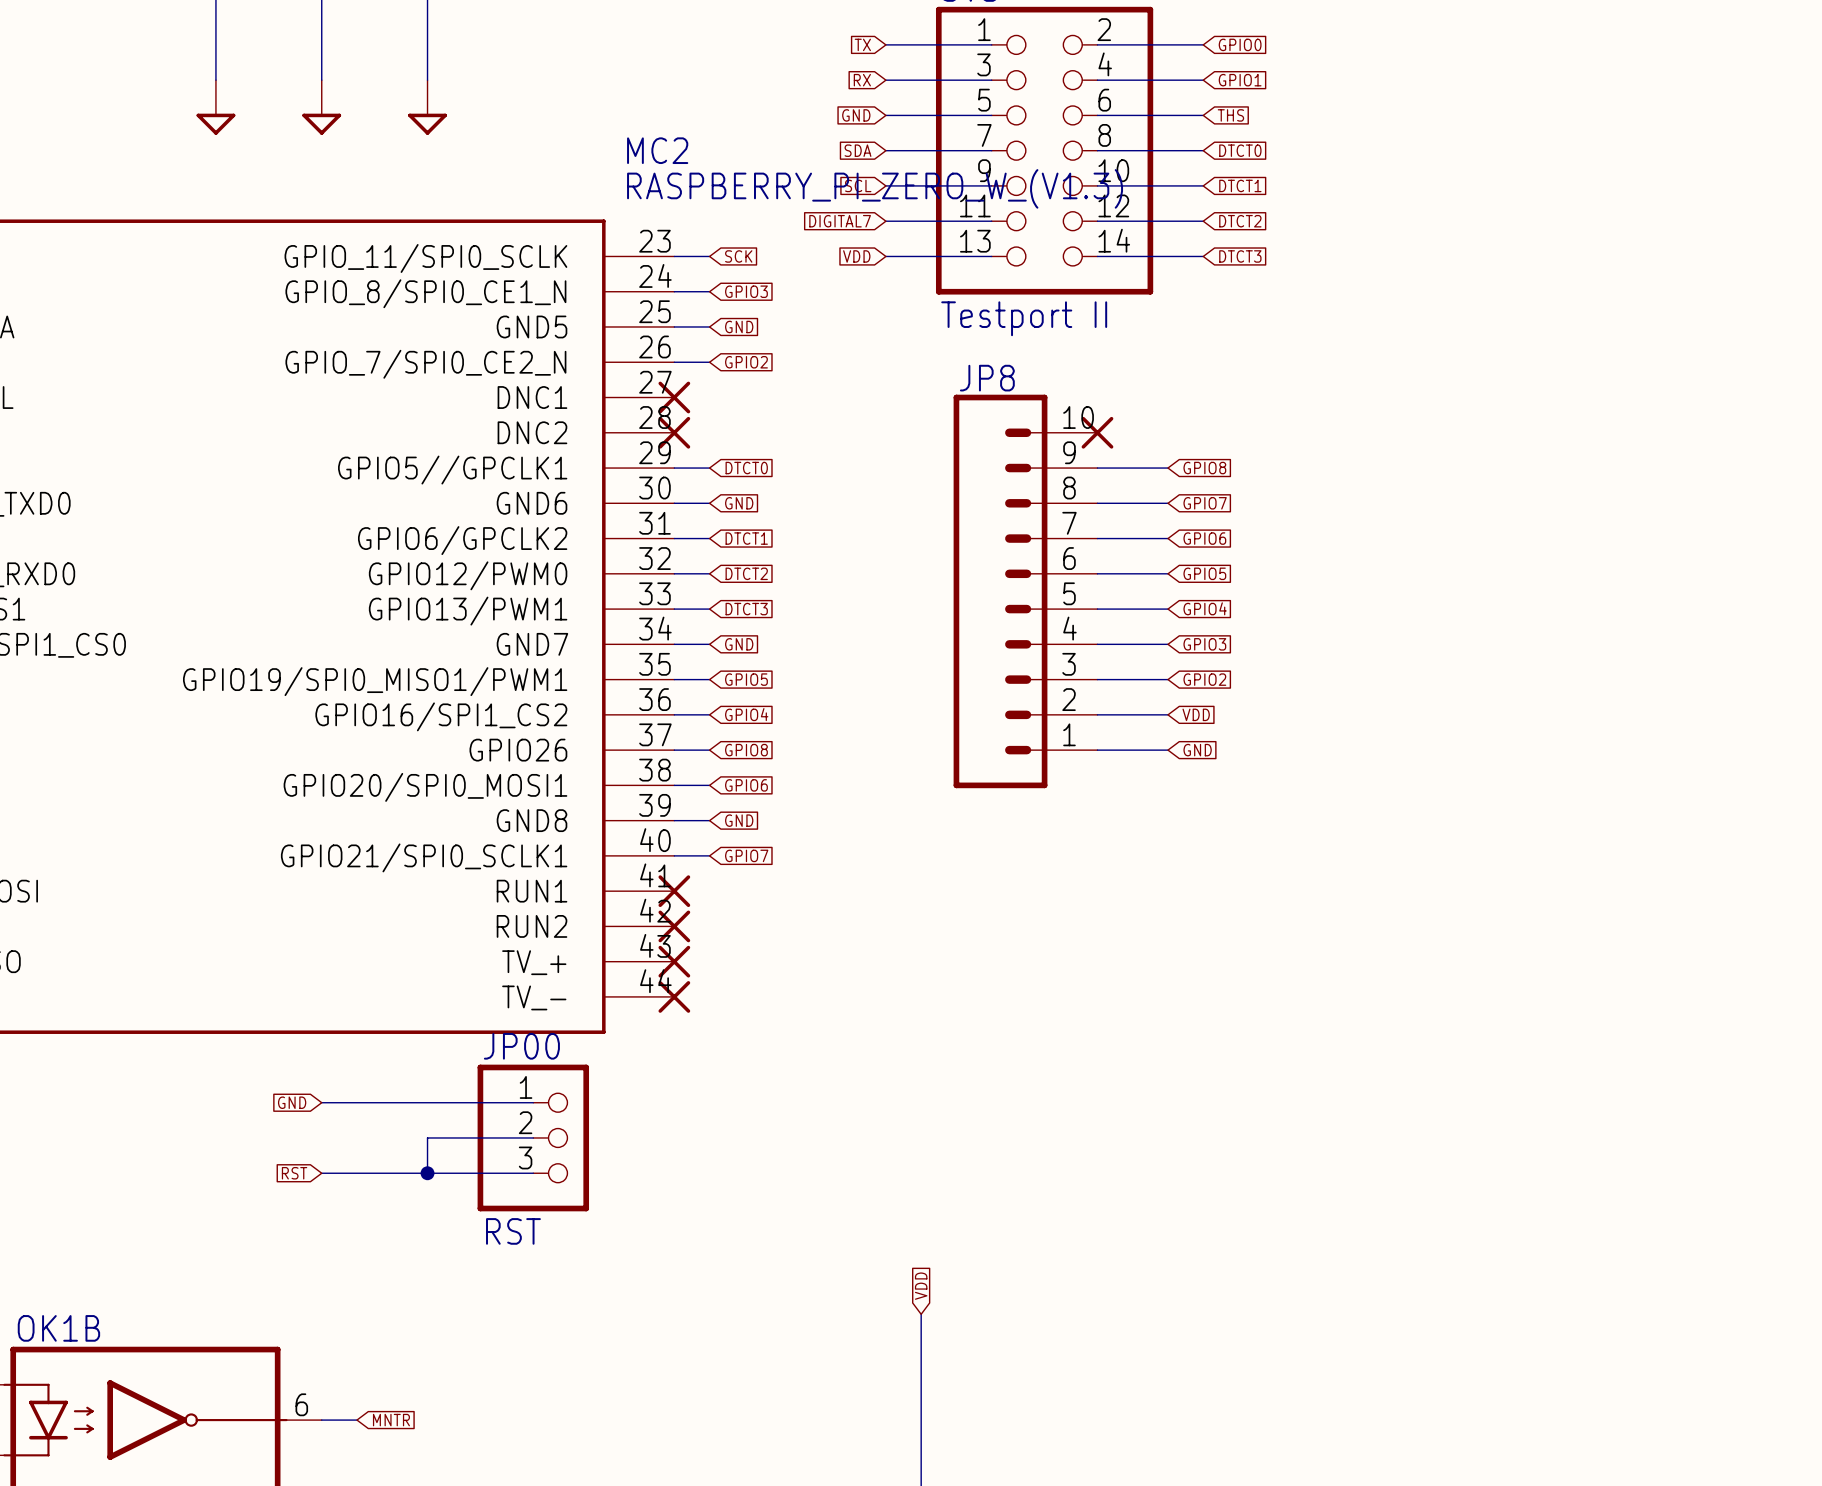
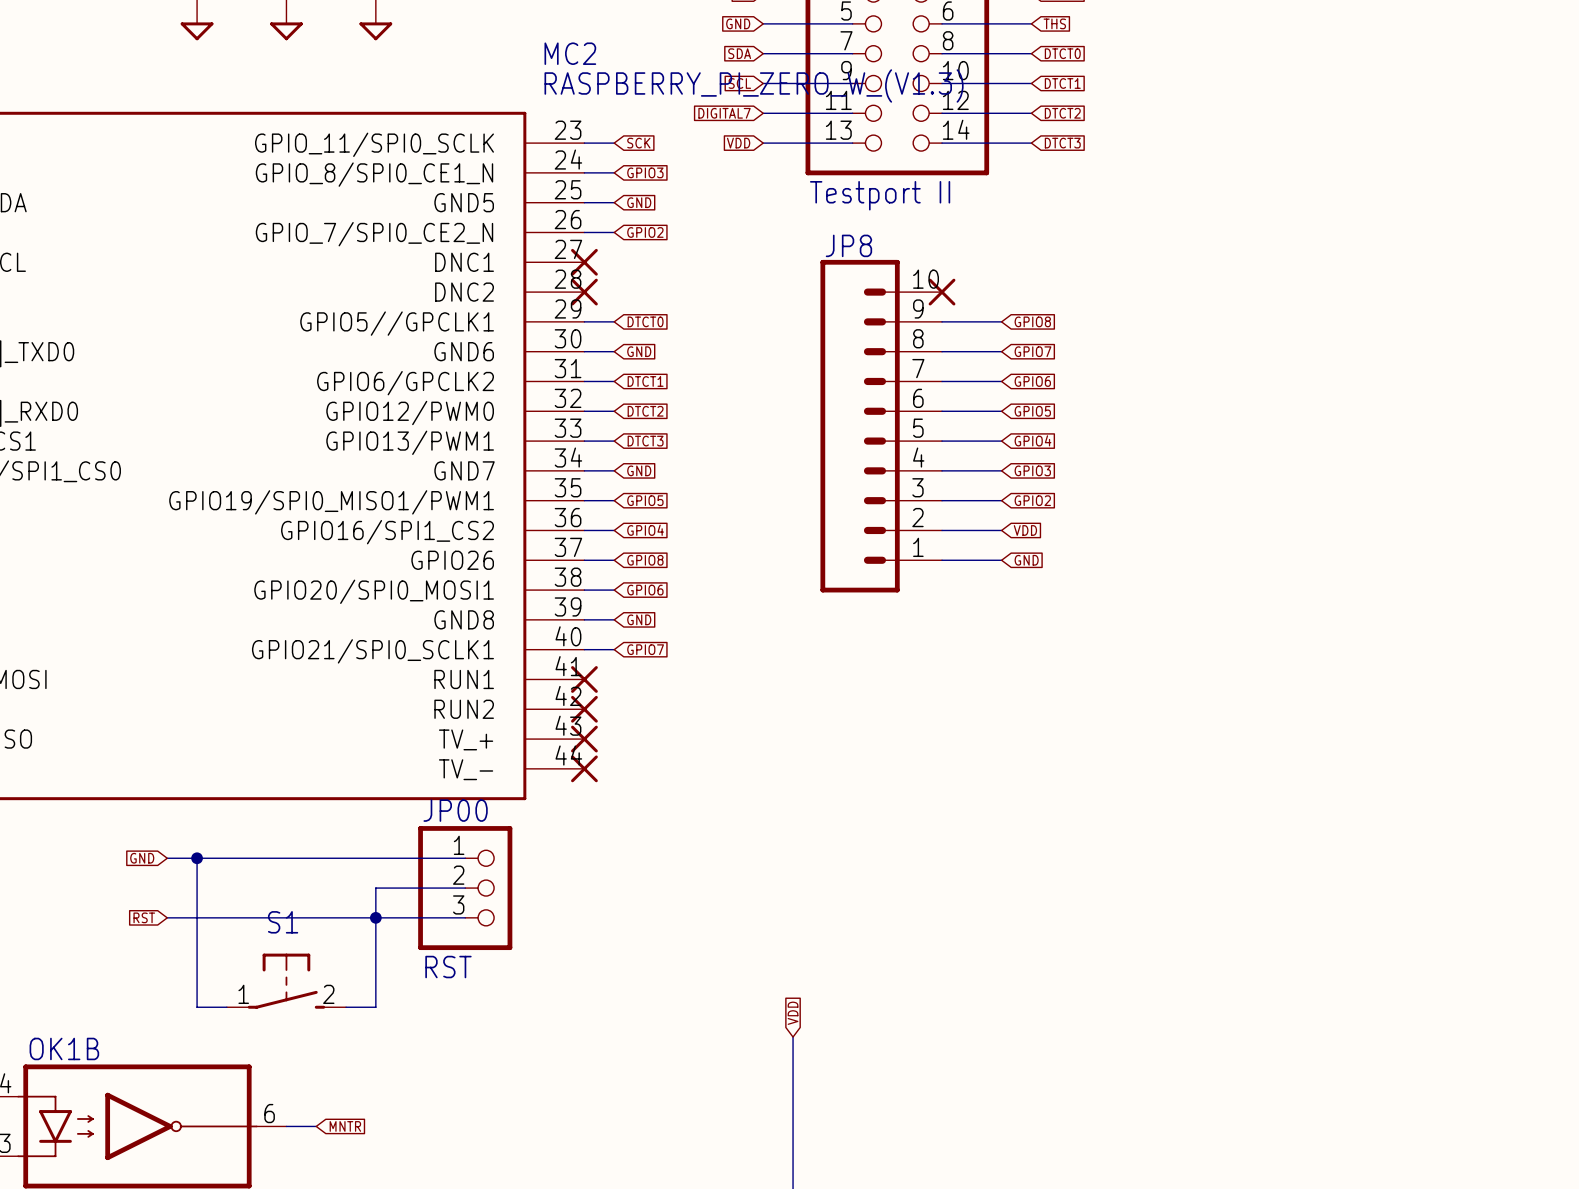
wire: none -> (167, 858) (286, 858)
wire: none -> (197, 858) (197, 1007) (226, 1007)
junction: none -> (197, 858)
global label position: GND (292, 1102) -> GND (142, 858)
wire: none -> (167, 917) (286, 917)
global label position: RST (294, 1173) -> RST (144, 917)
wire: none -> (375, 917) (375, 1007) (346, 1007)
S1: none -> (286, 981)

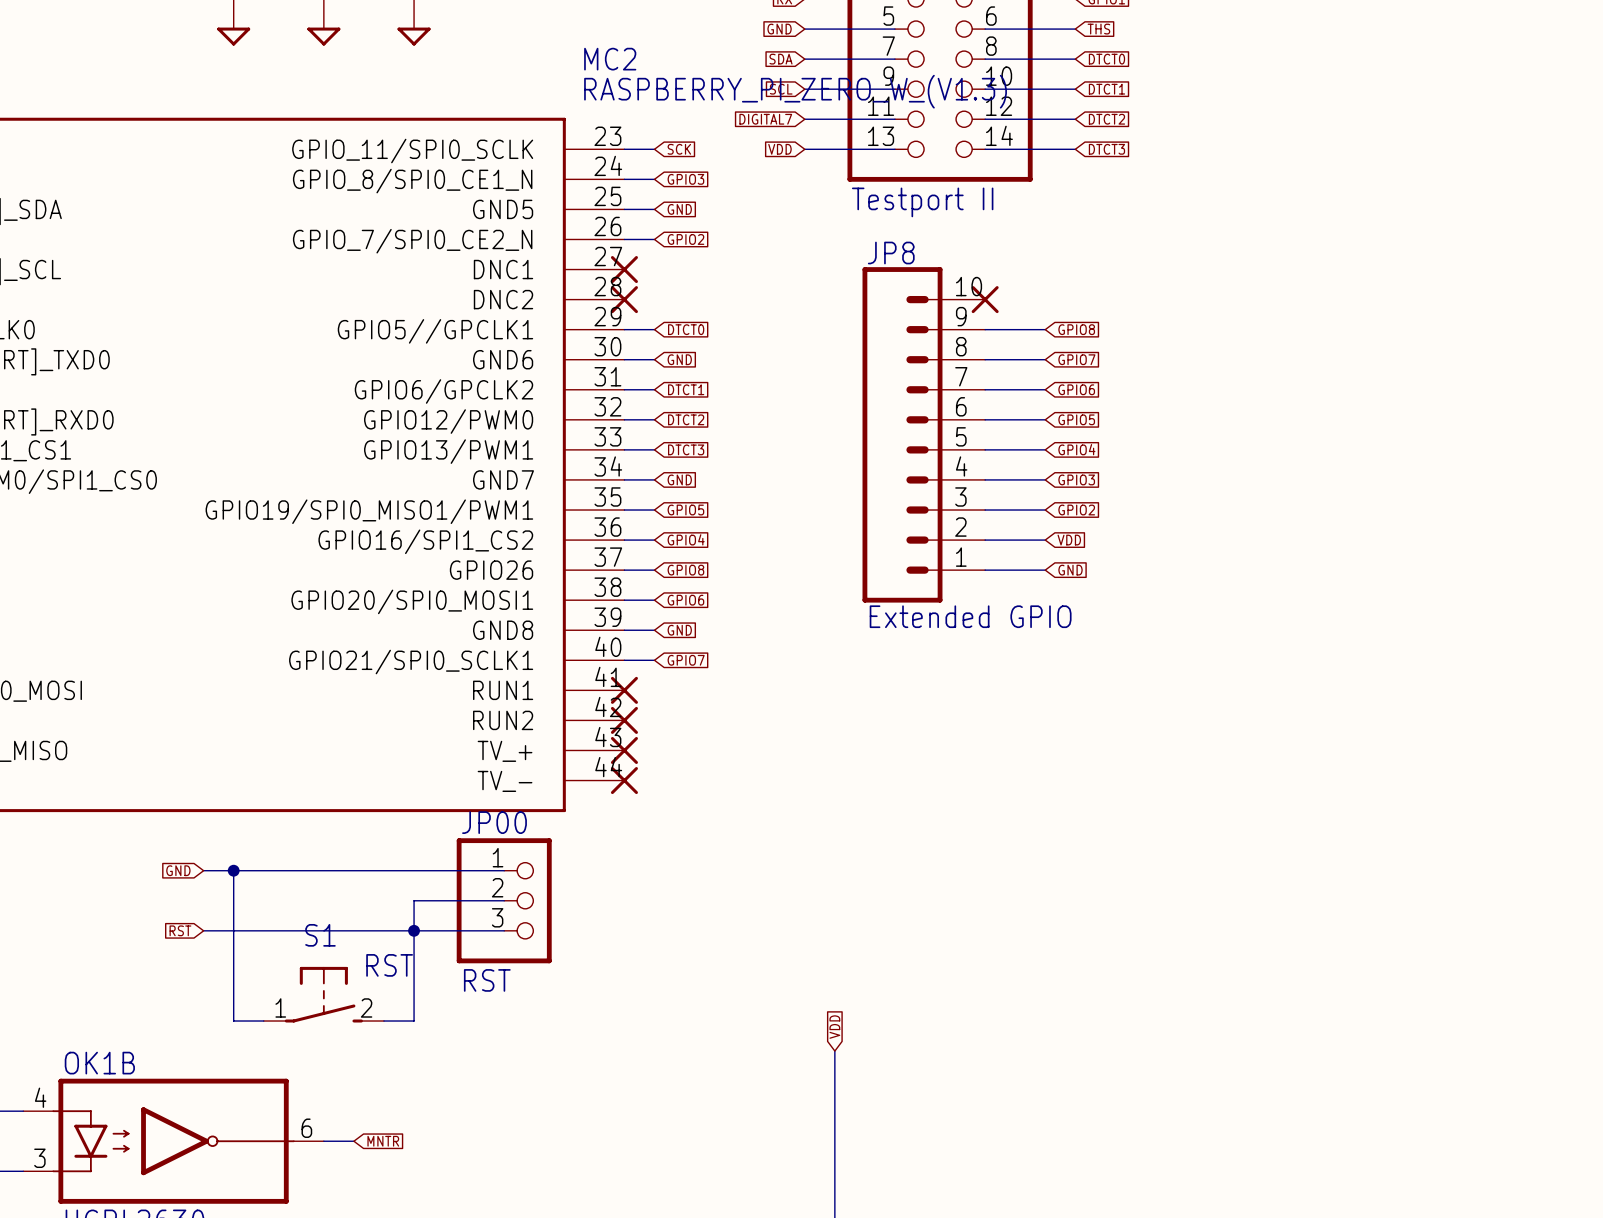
JP8 value: none -> Extended GPIO (970, 616)
S1 value: none -> RST (389, 965)

